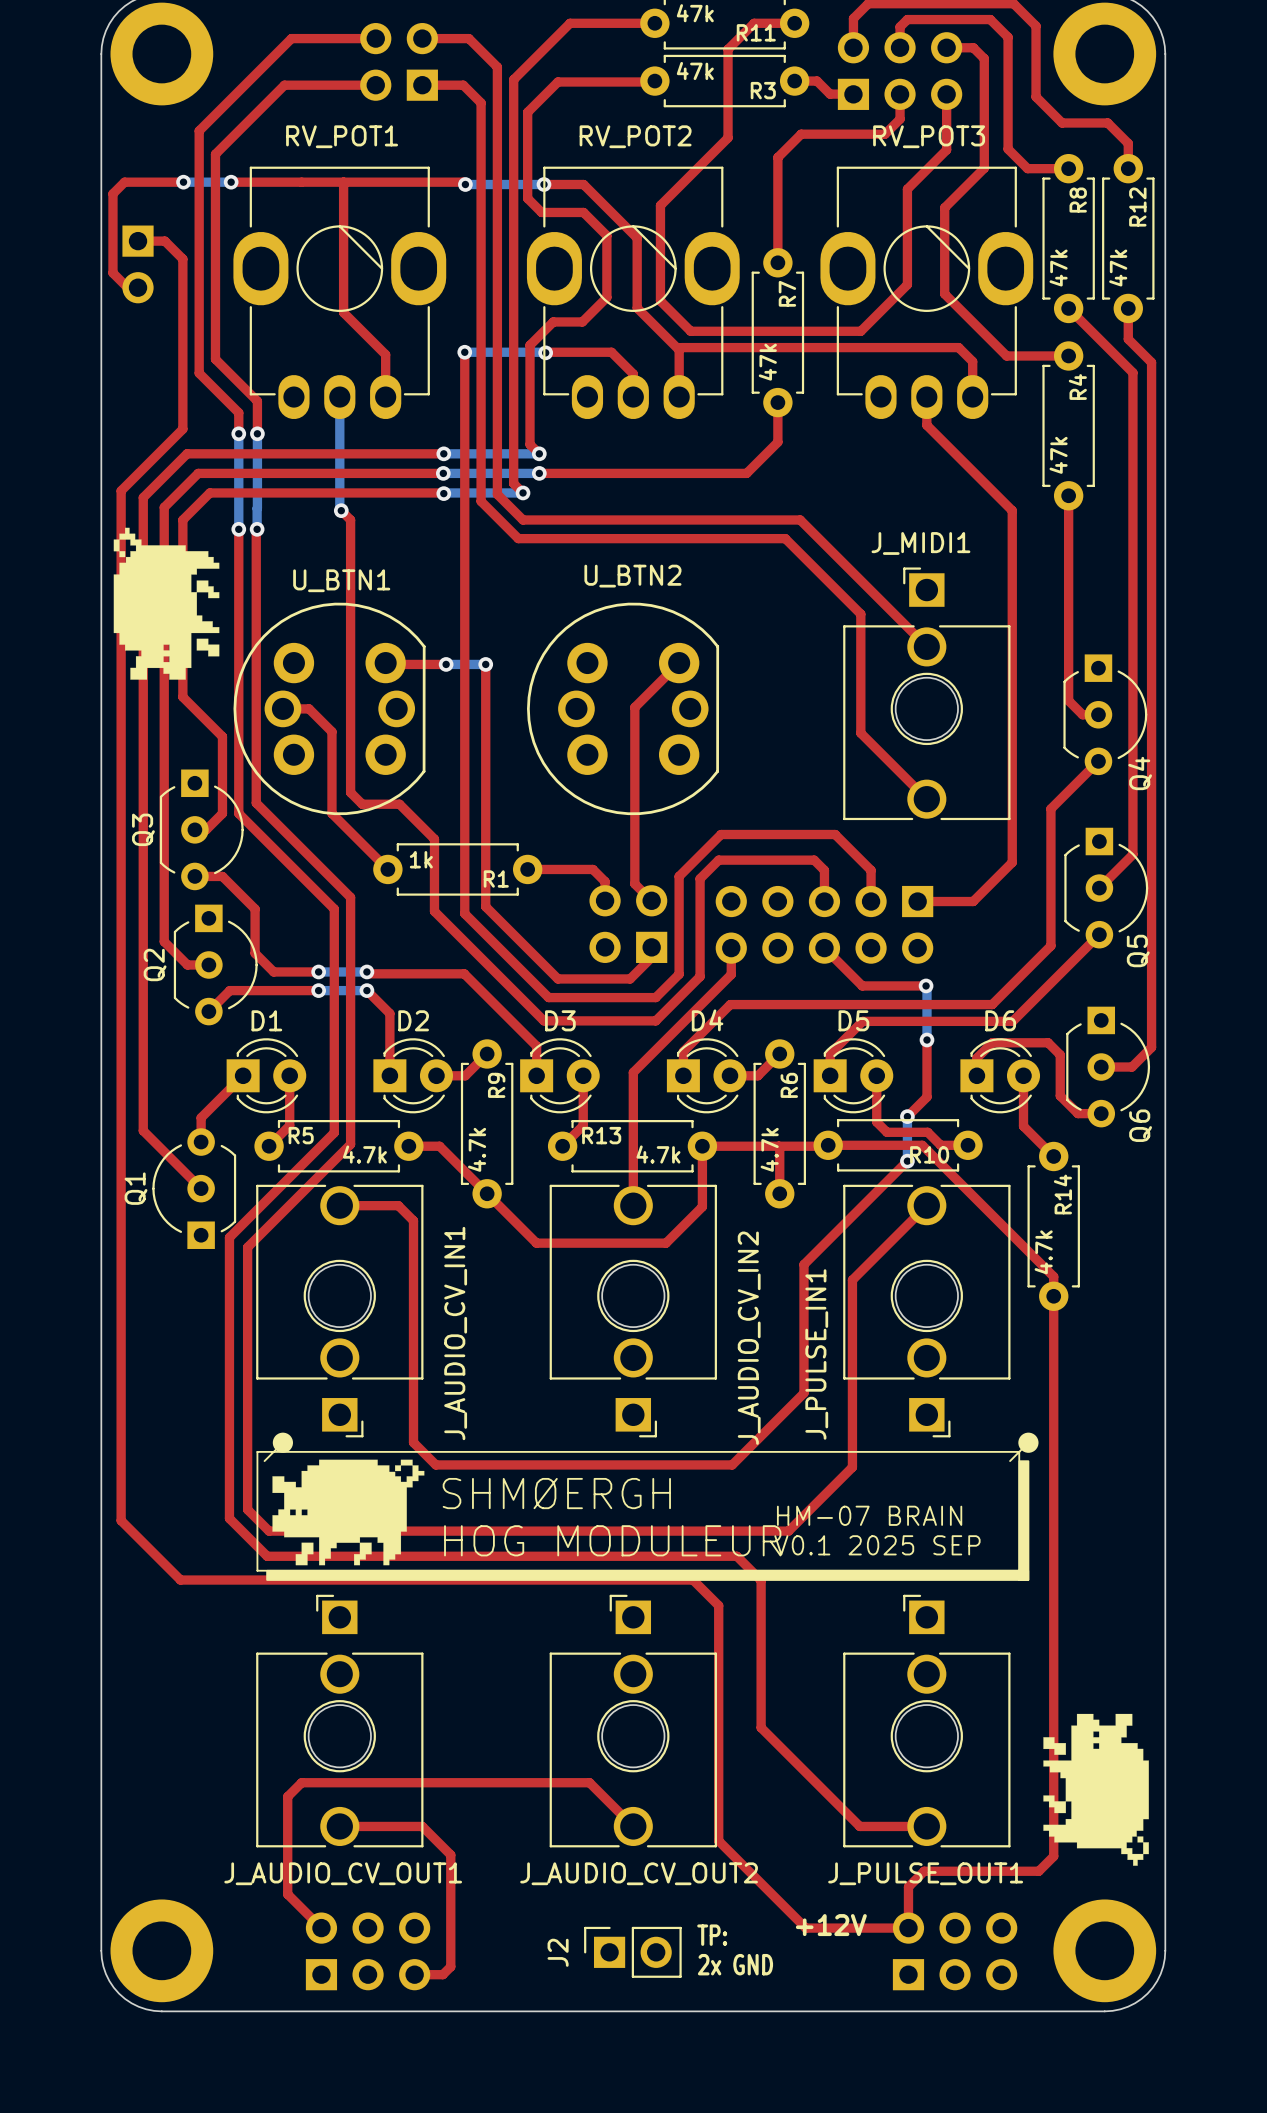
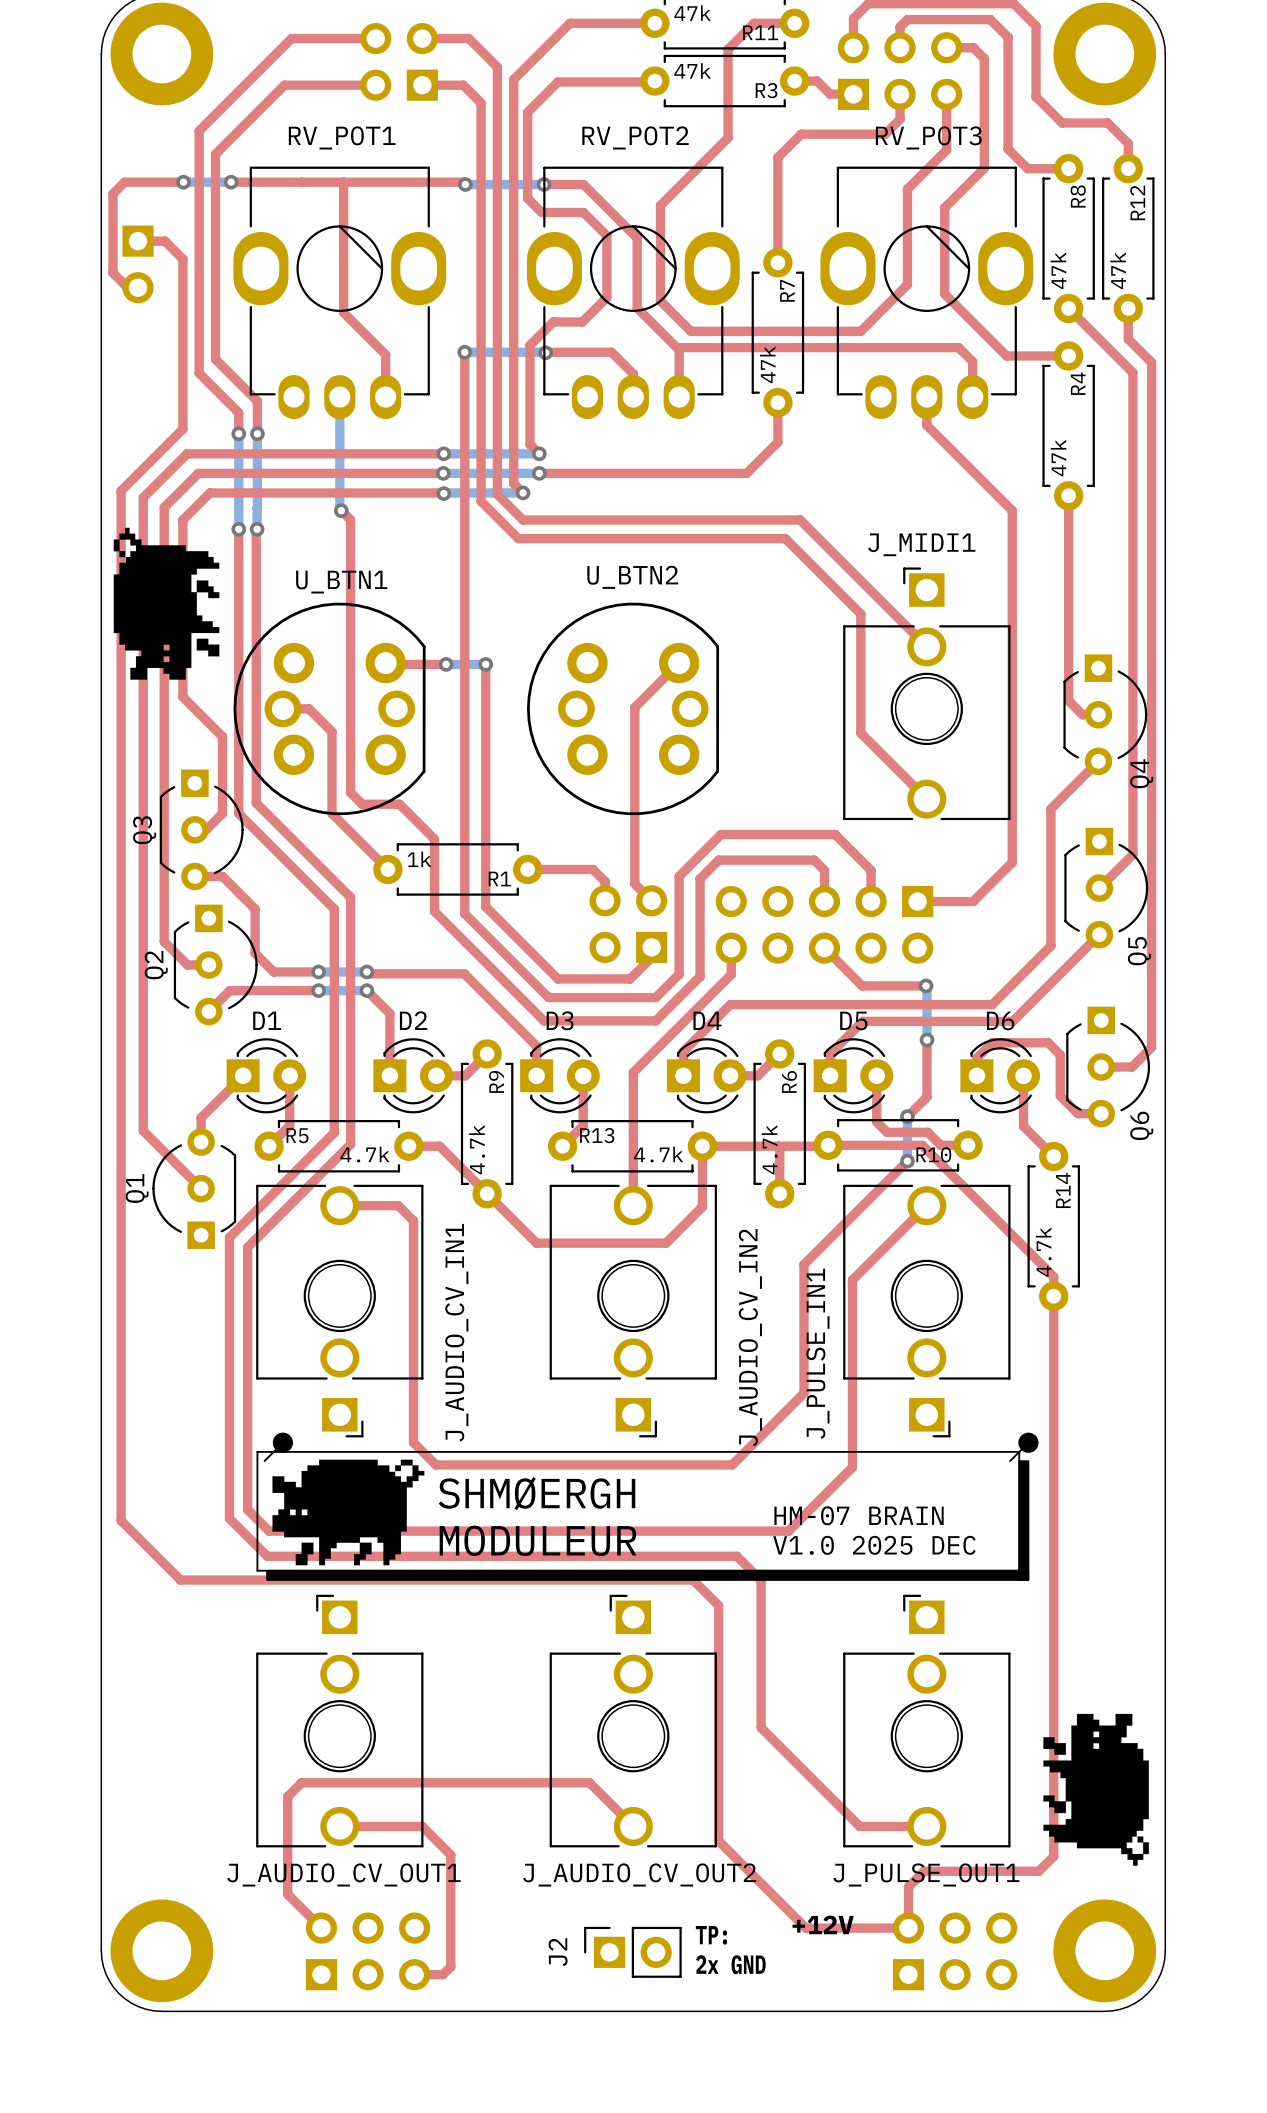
text: HOG MODULEUR (612, 1540) -> MODULEUR (538, 1540)
text: V0.1 2025 SEP (877, 1545) -> V1.0 2025 DEC (874, 1545)

